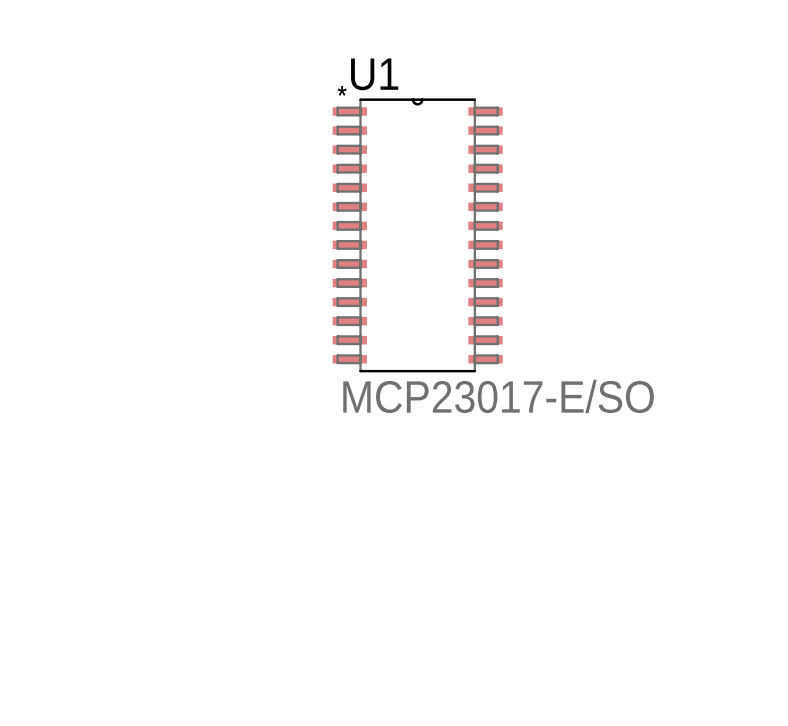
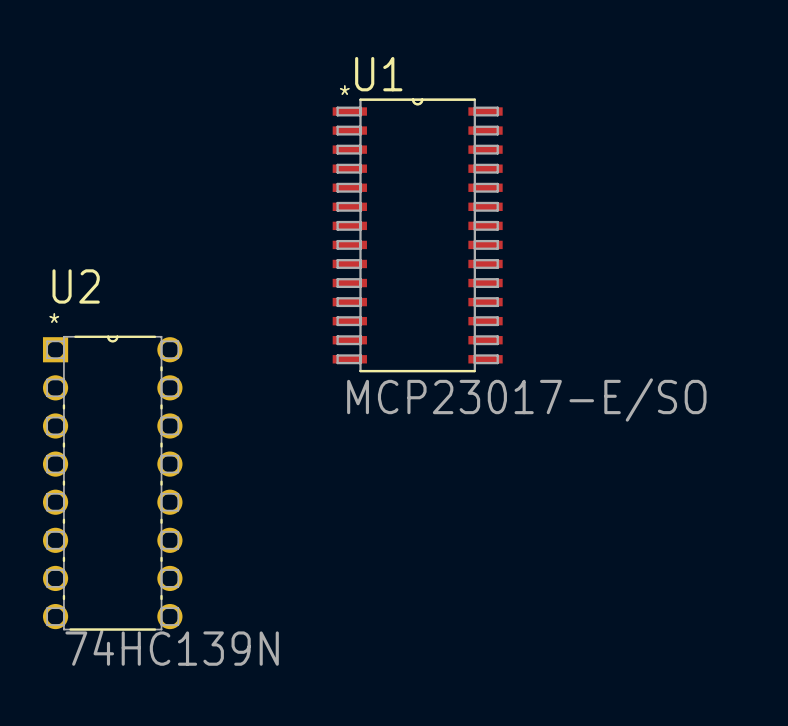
U2: none -> 74HC139N (112, 483)

